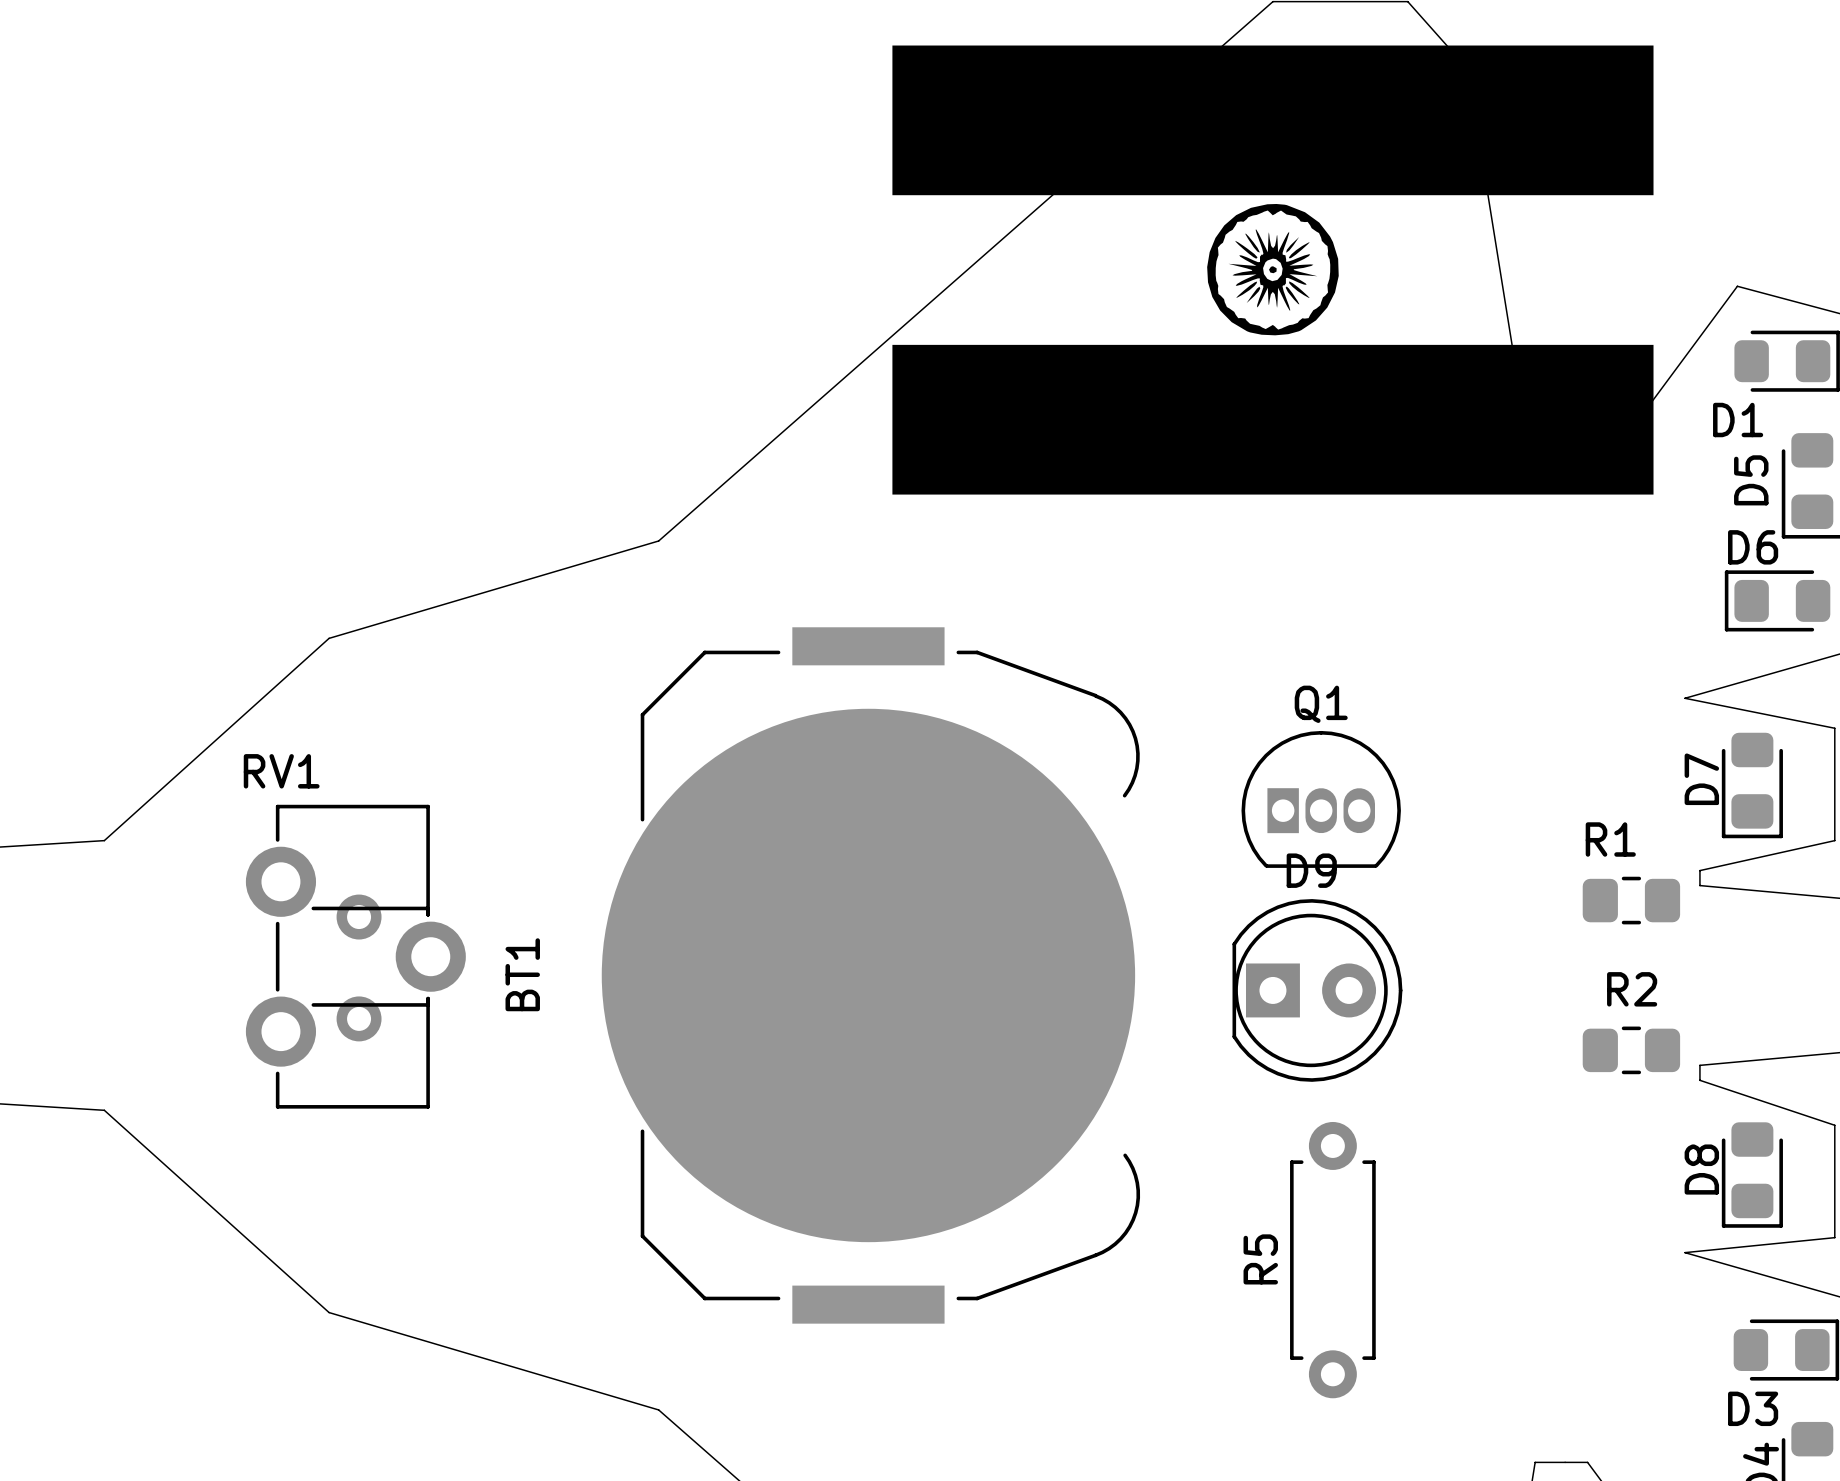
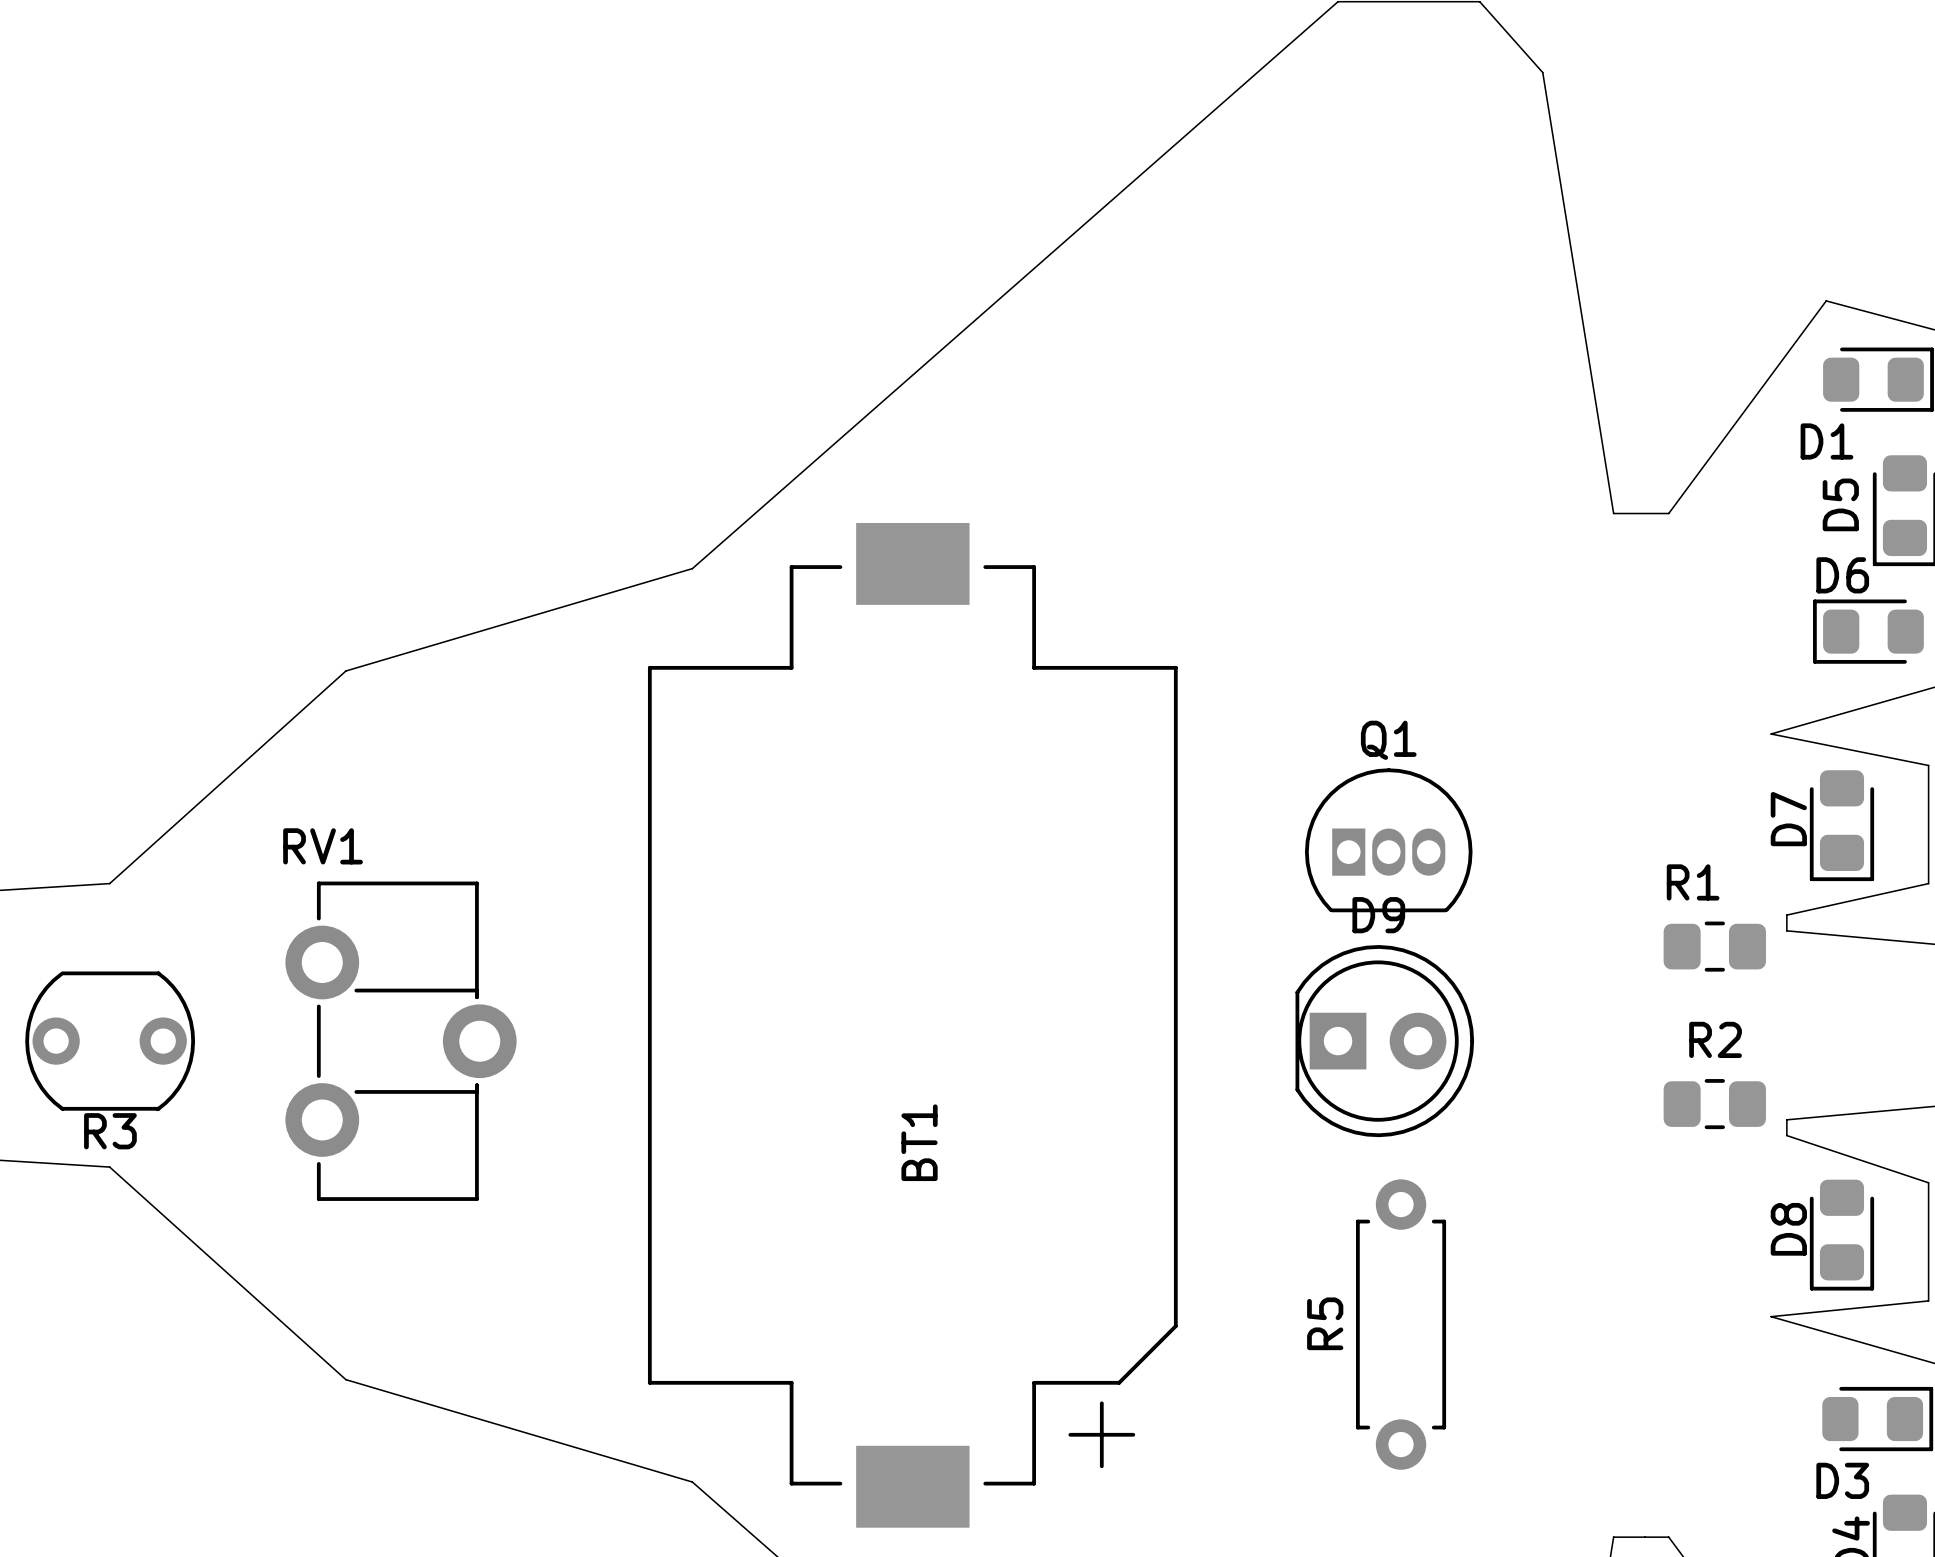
drawing: [892, 45, 1654, 495] -> none
BT1 footprint: [601, 627, 1141, 1324] -> [647, 522, 1178, 1528]
RV1 position: (355, 956) -> (401, 1041)
R3 side: bottom (359, 967) -> top (110, 1041)
BT1 name position: BT1 (522, 974) -> BT1 (919, 1142)

